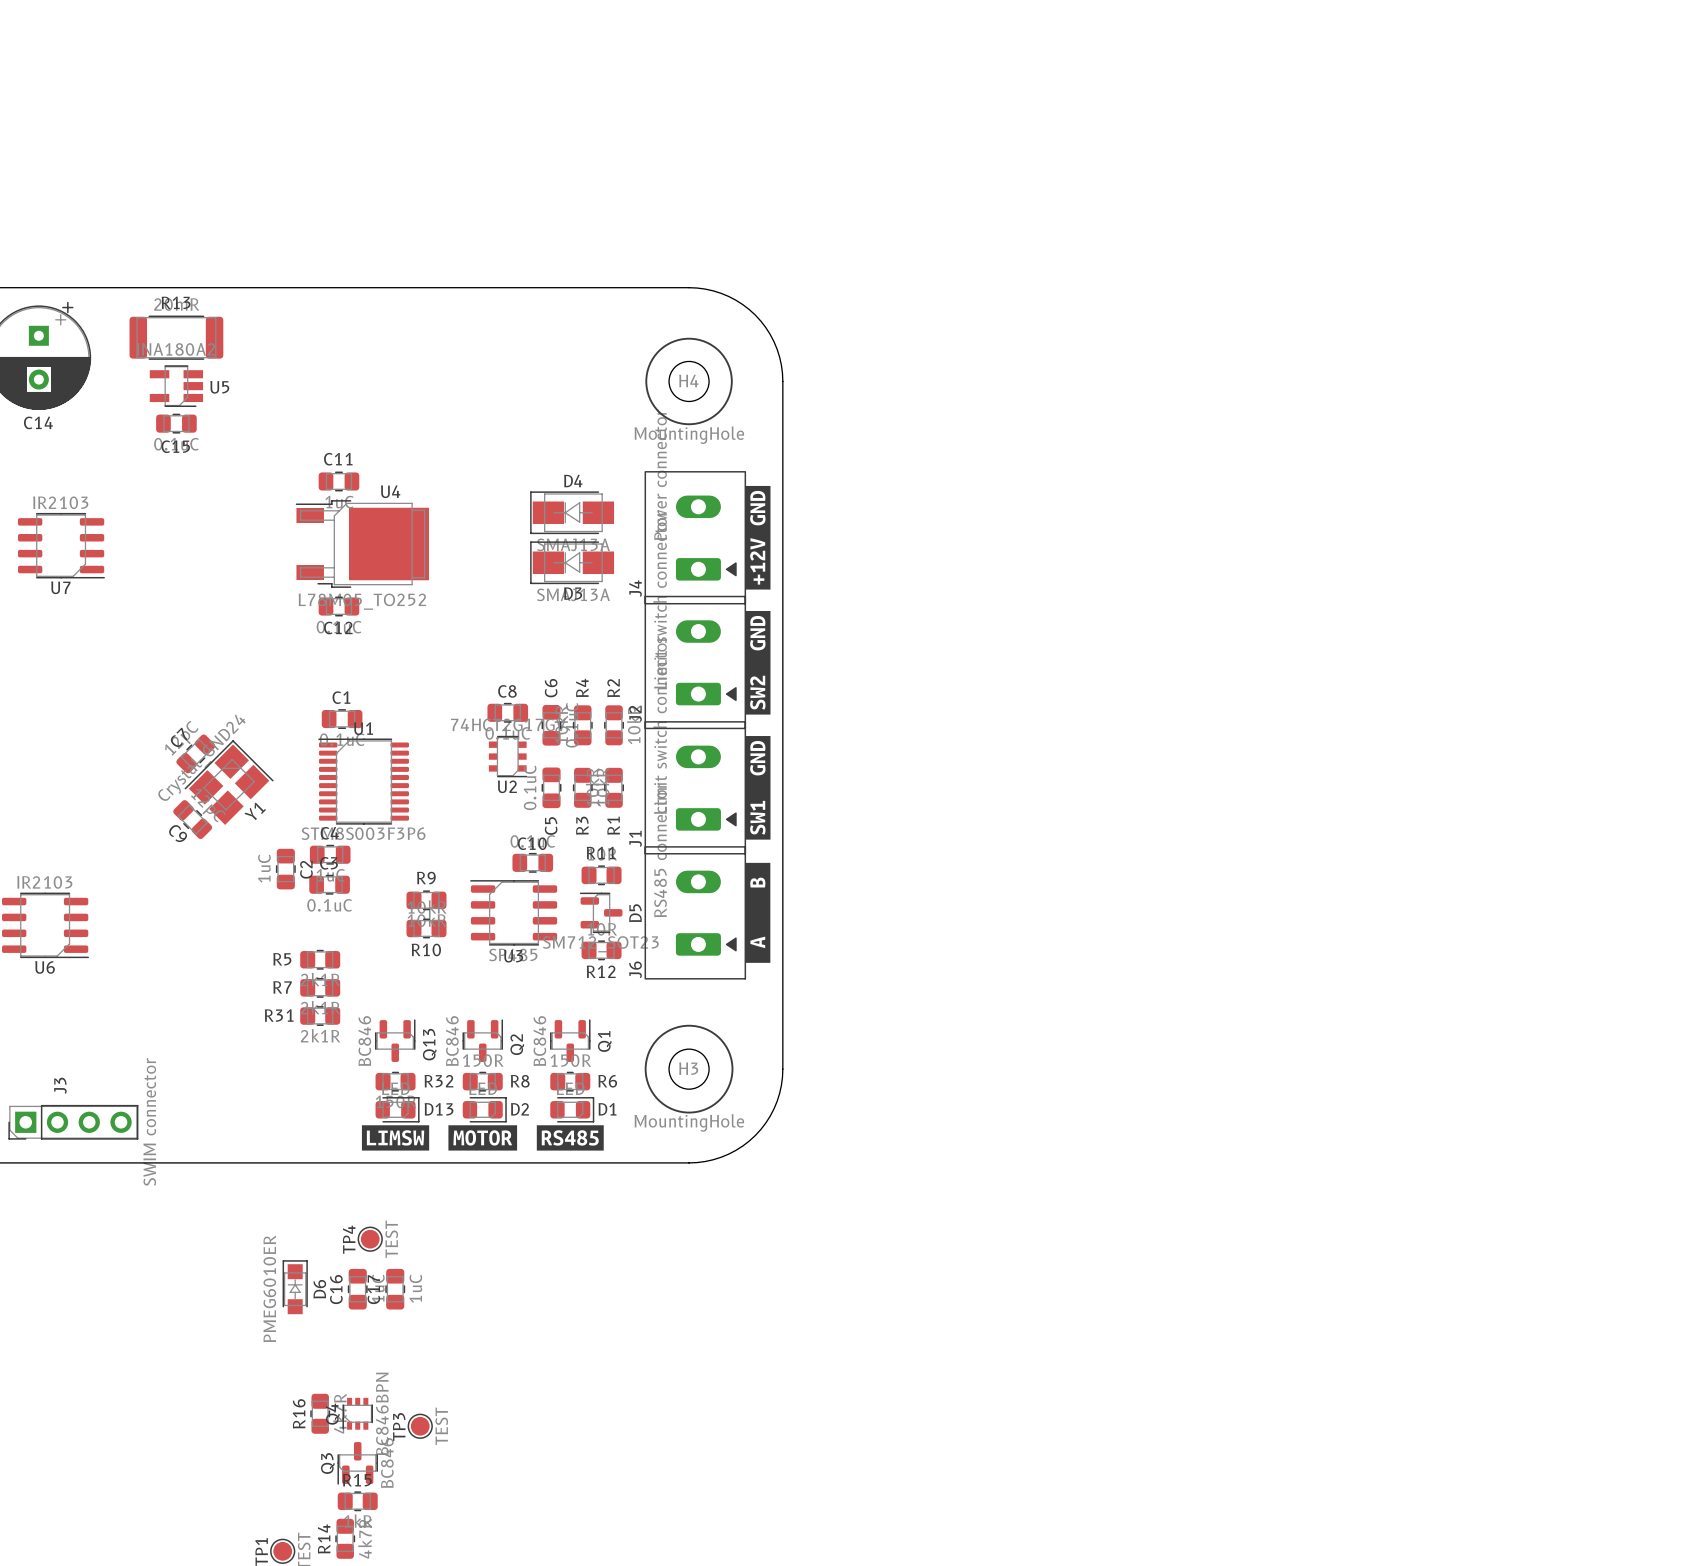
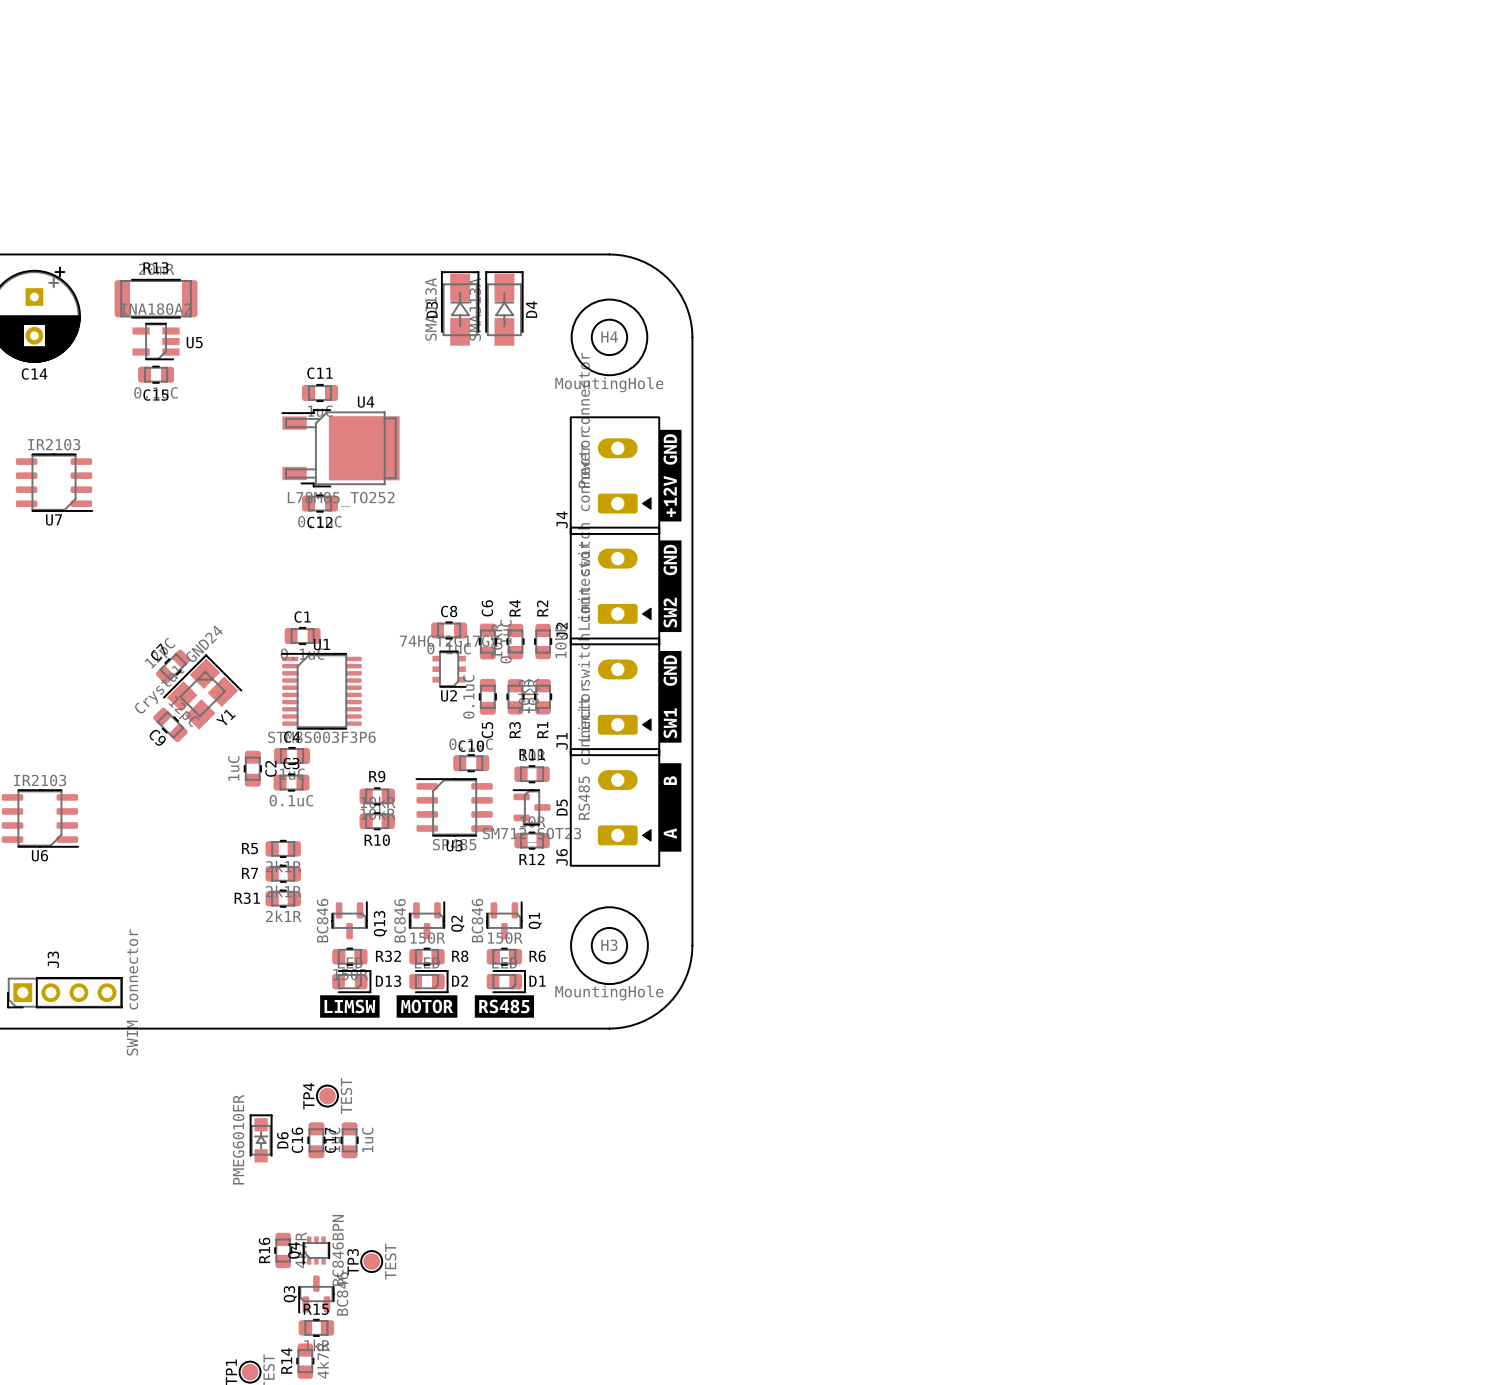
C11 position: (338, 481) -> (320, 392)
D4 rotation: 0° (572, 512) -> 90° clockwise (504, 308)
D4 position: (572, 512) -> (504, 308)
U4 position: (362, 544) -> (340, 448)
D3 rotation: 0° (572, 562) -> 90° clockwise (460, 308)
D3 position: (572, 562) -> (460, 308)
C12 position: (338, 606) -> (320, 503)

